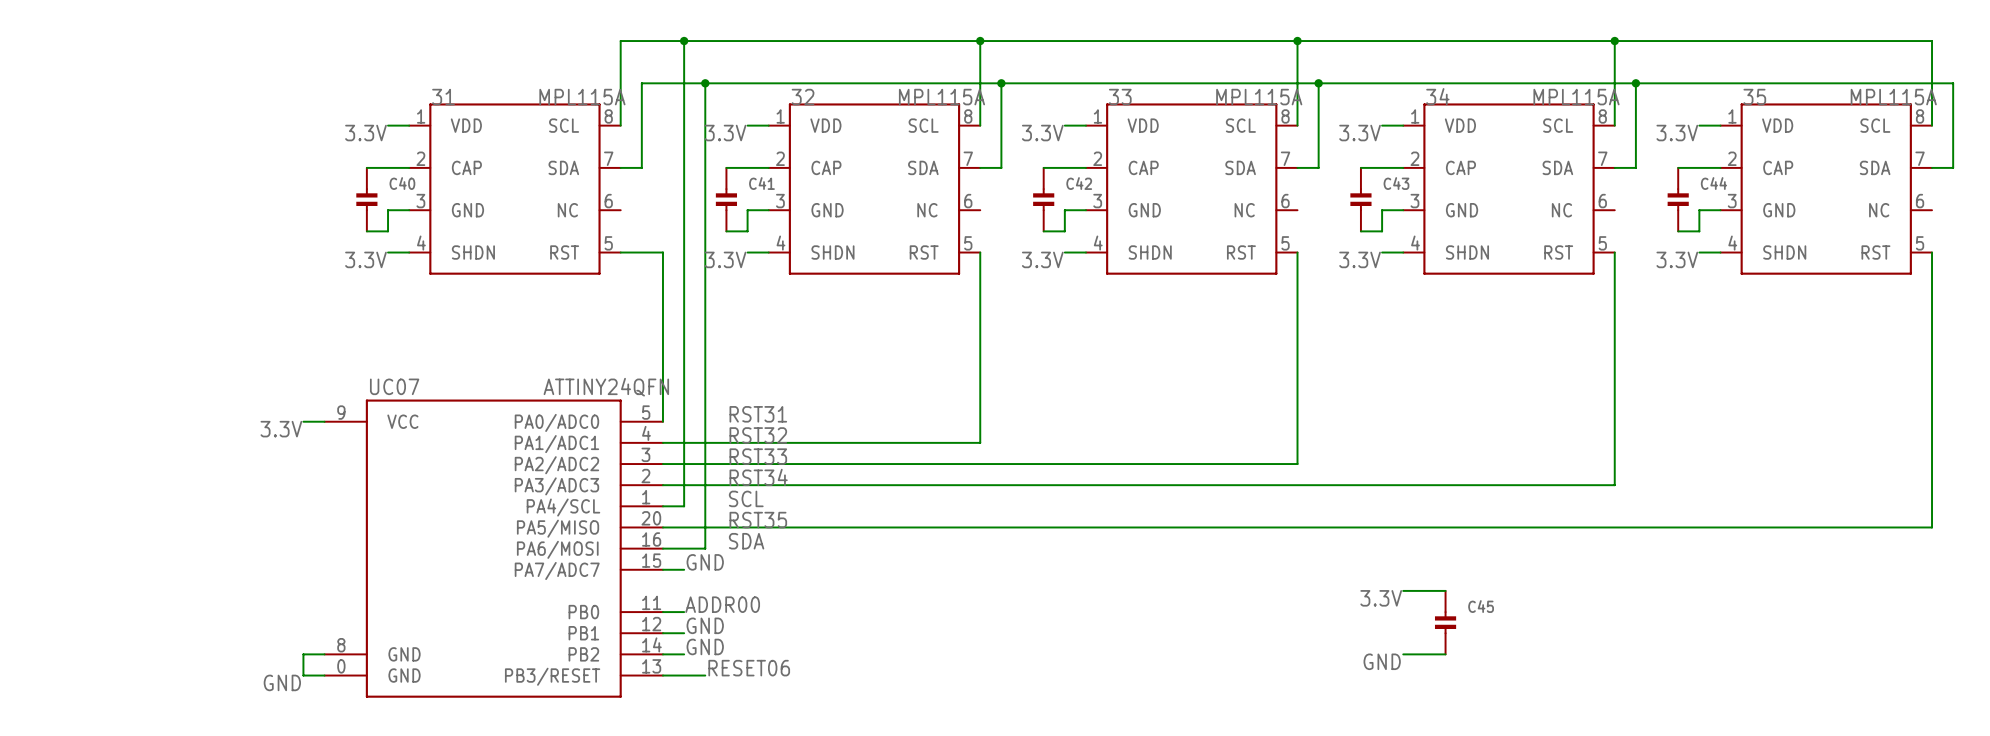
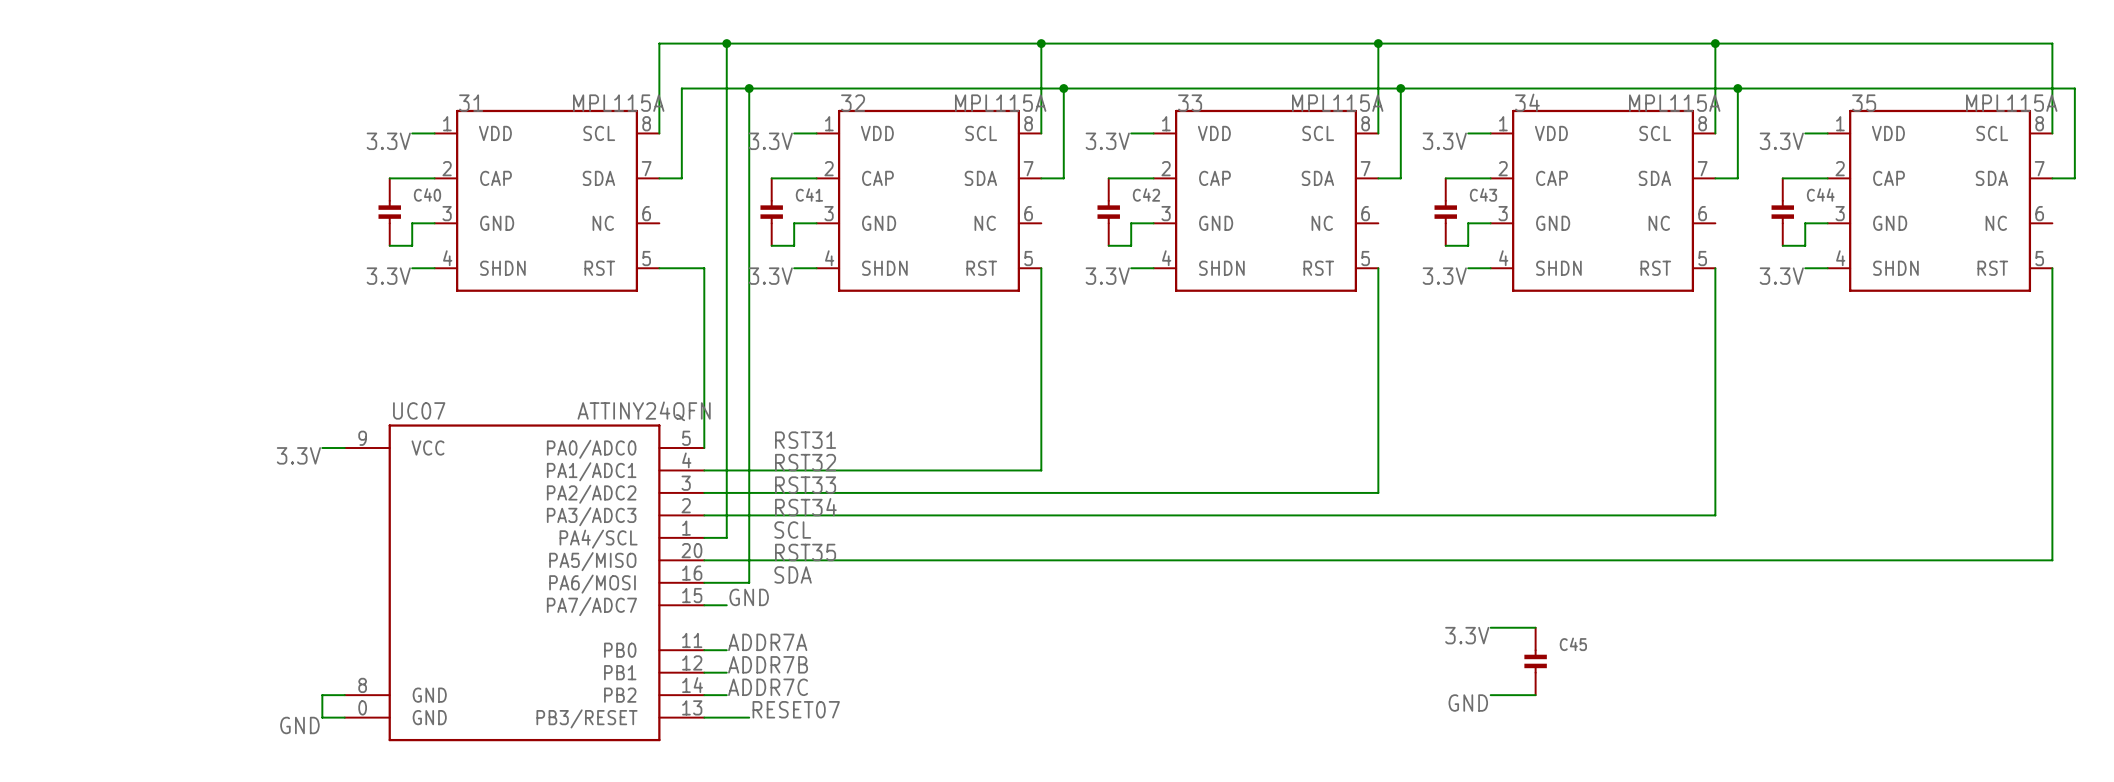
label: ADDR00 (722, 604) -> ADDR7A (767, 642)
label: GND (705, 625) -> ADDR7B (768, 664)
label: GND (705, 646) -> ADDR7C (768, 687)
label: RESET06 (749, 668) -> RESET07 (796, 709)

